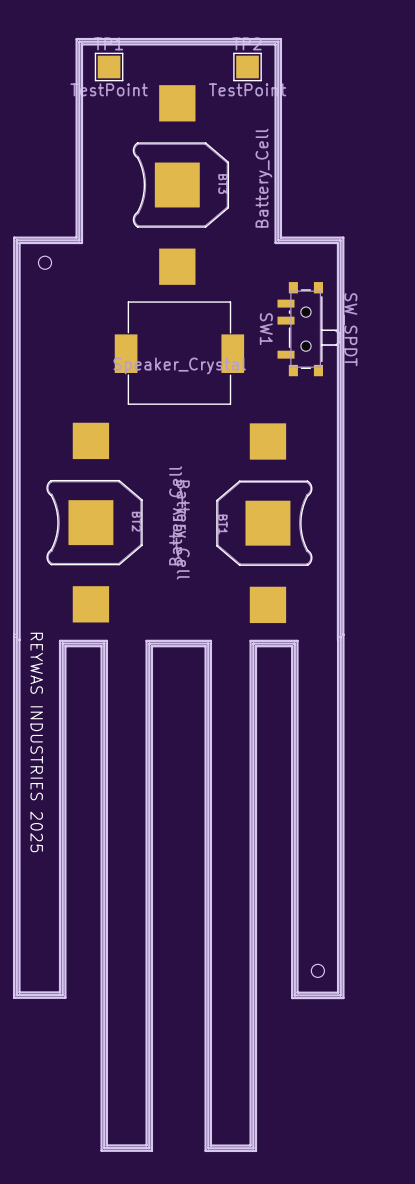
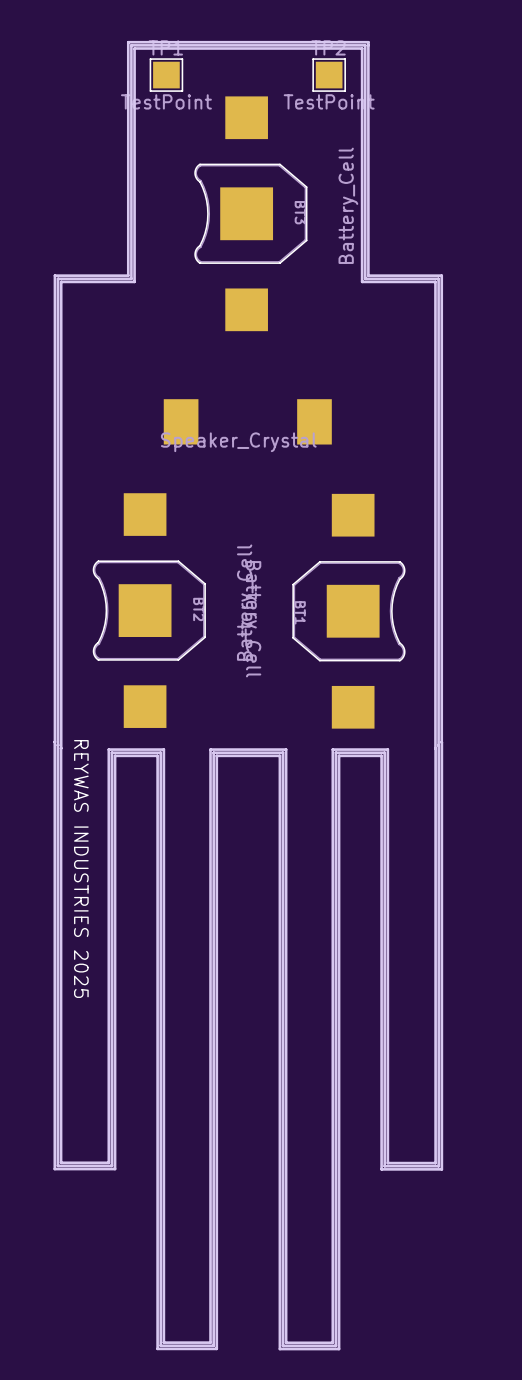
round board edge: [38, 255, 52, 270] -> none
part footprint: [114, 301, 245, 405] -> [163, 399, 332, 445]
SW1: SW_SPDT (308, 329) -> none
round board edge: [311, 964, 325, 978] -> none

